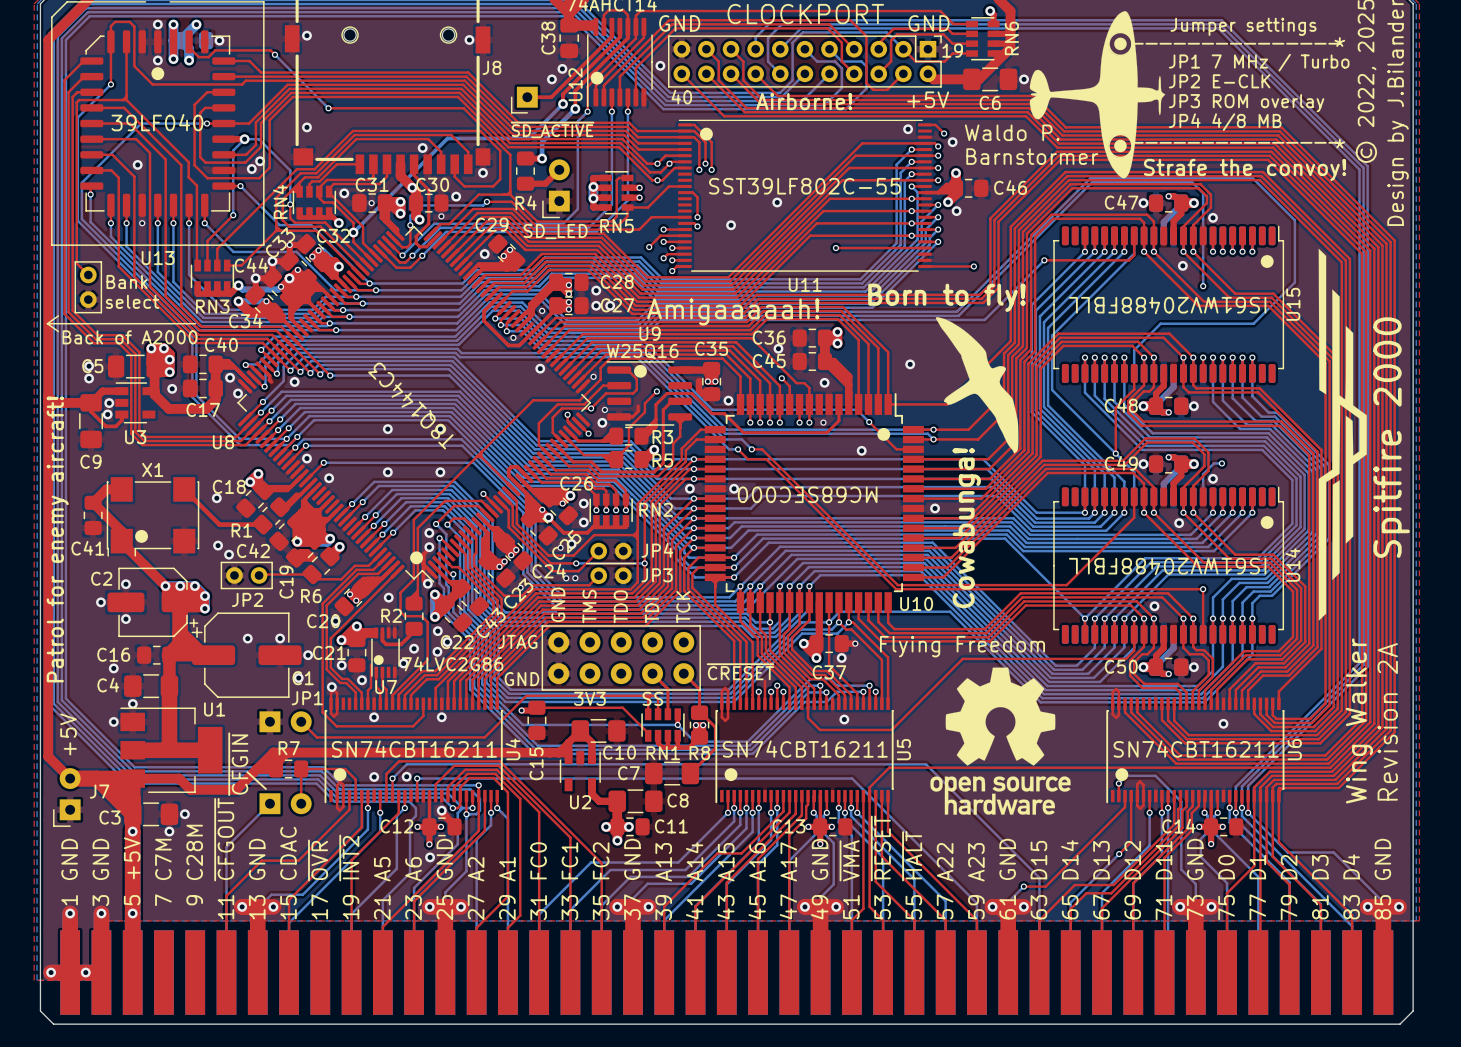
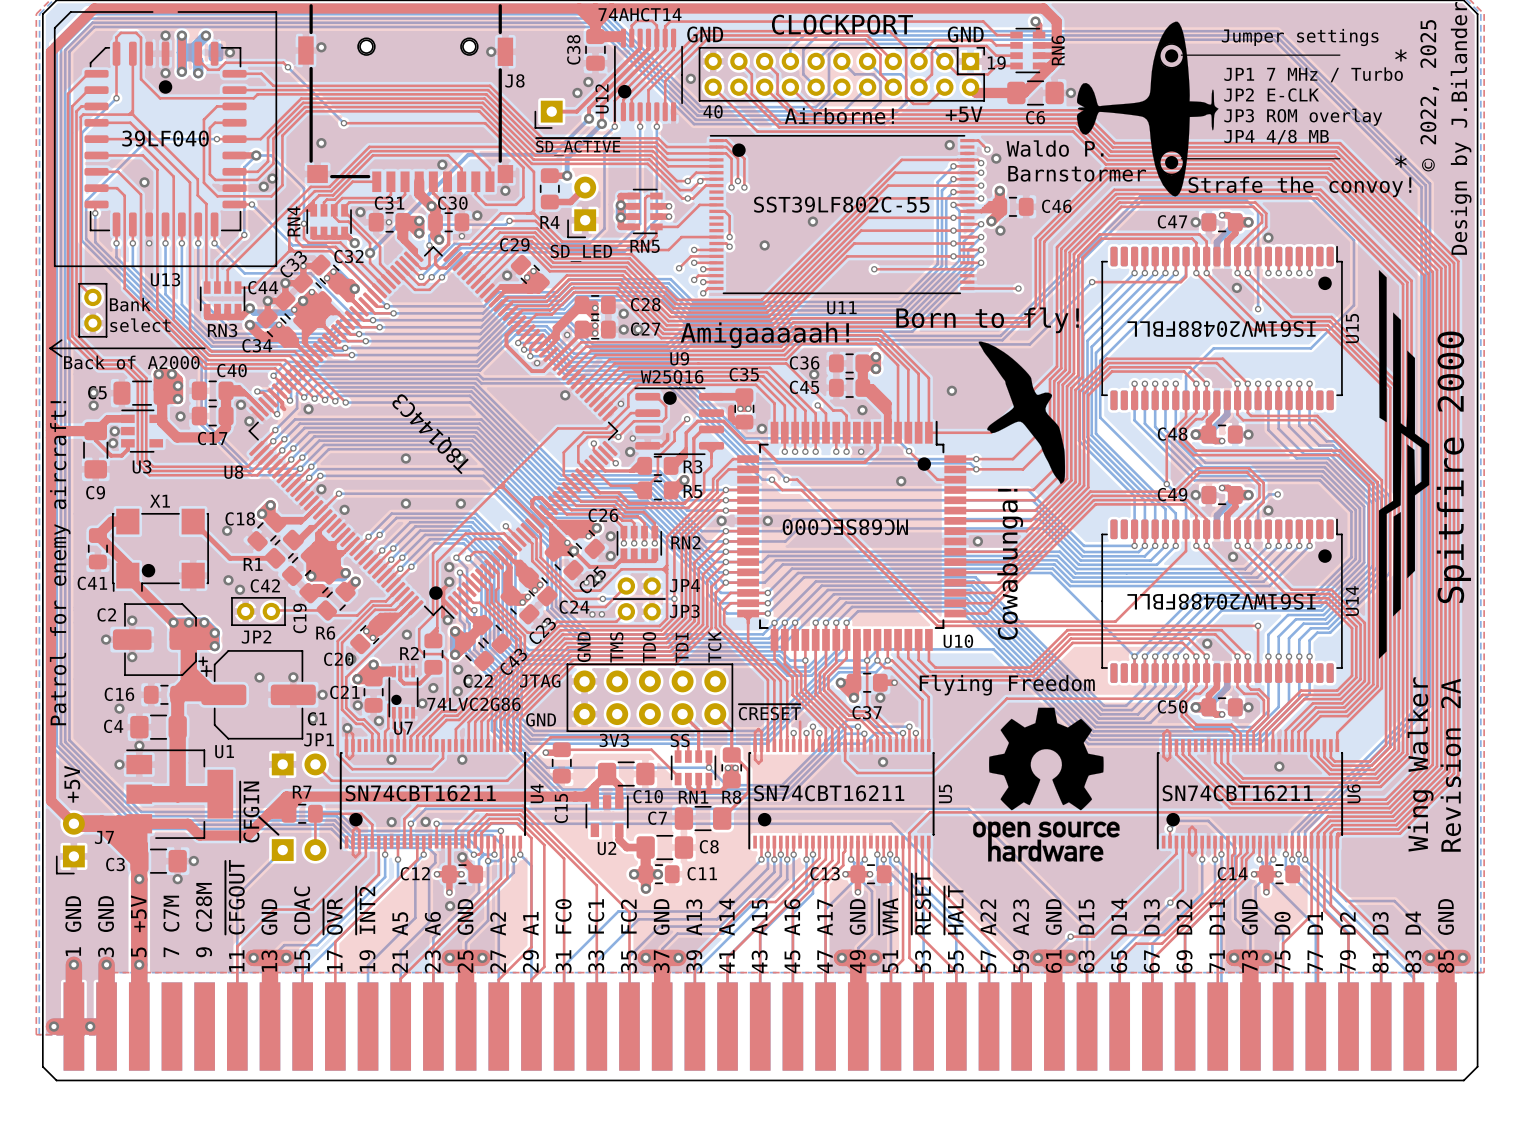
top track: (351, 860) (351, 972) -> (368, 909) (335, 941) (335, 1026)

